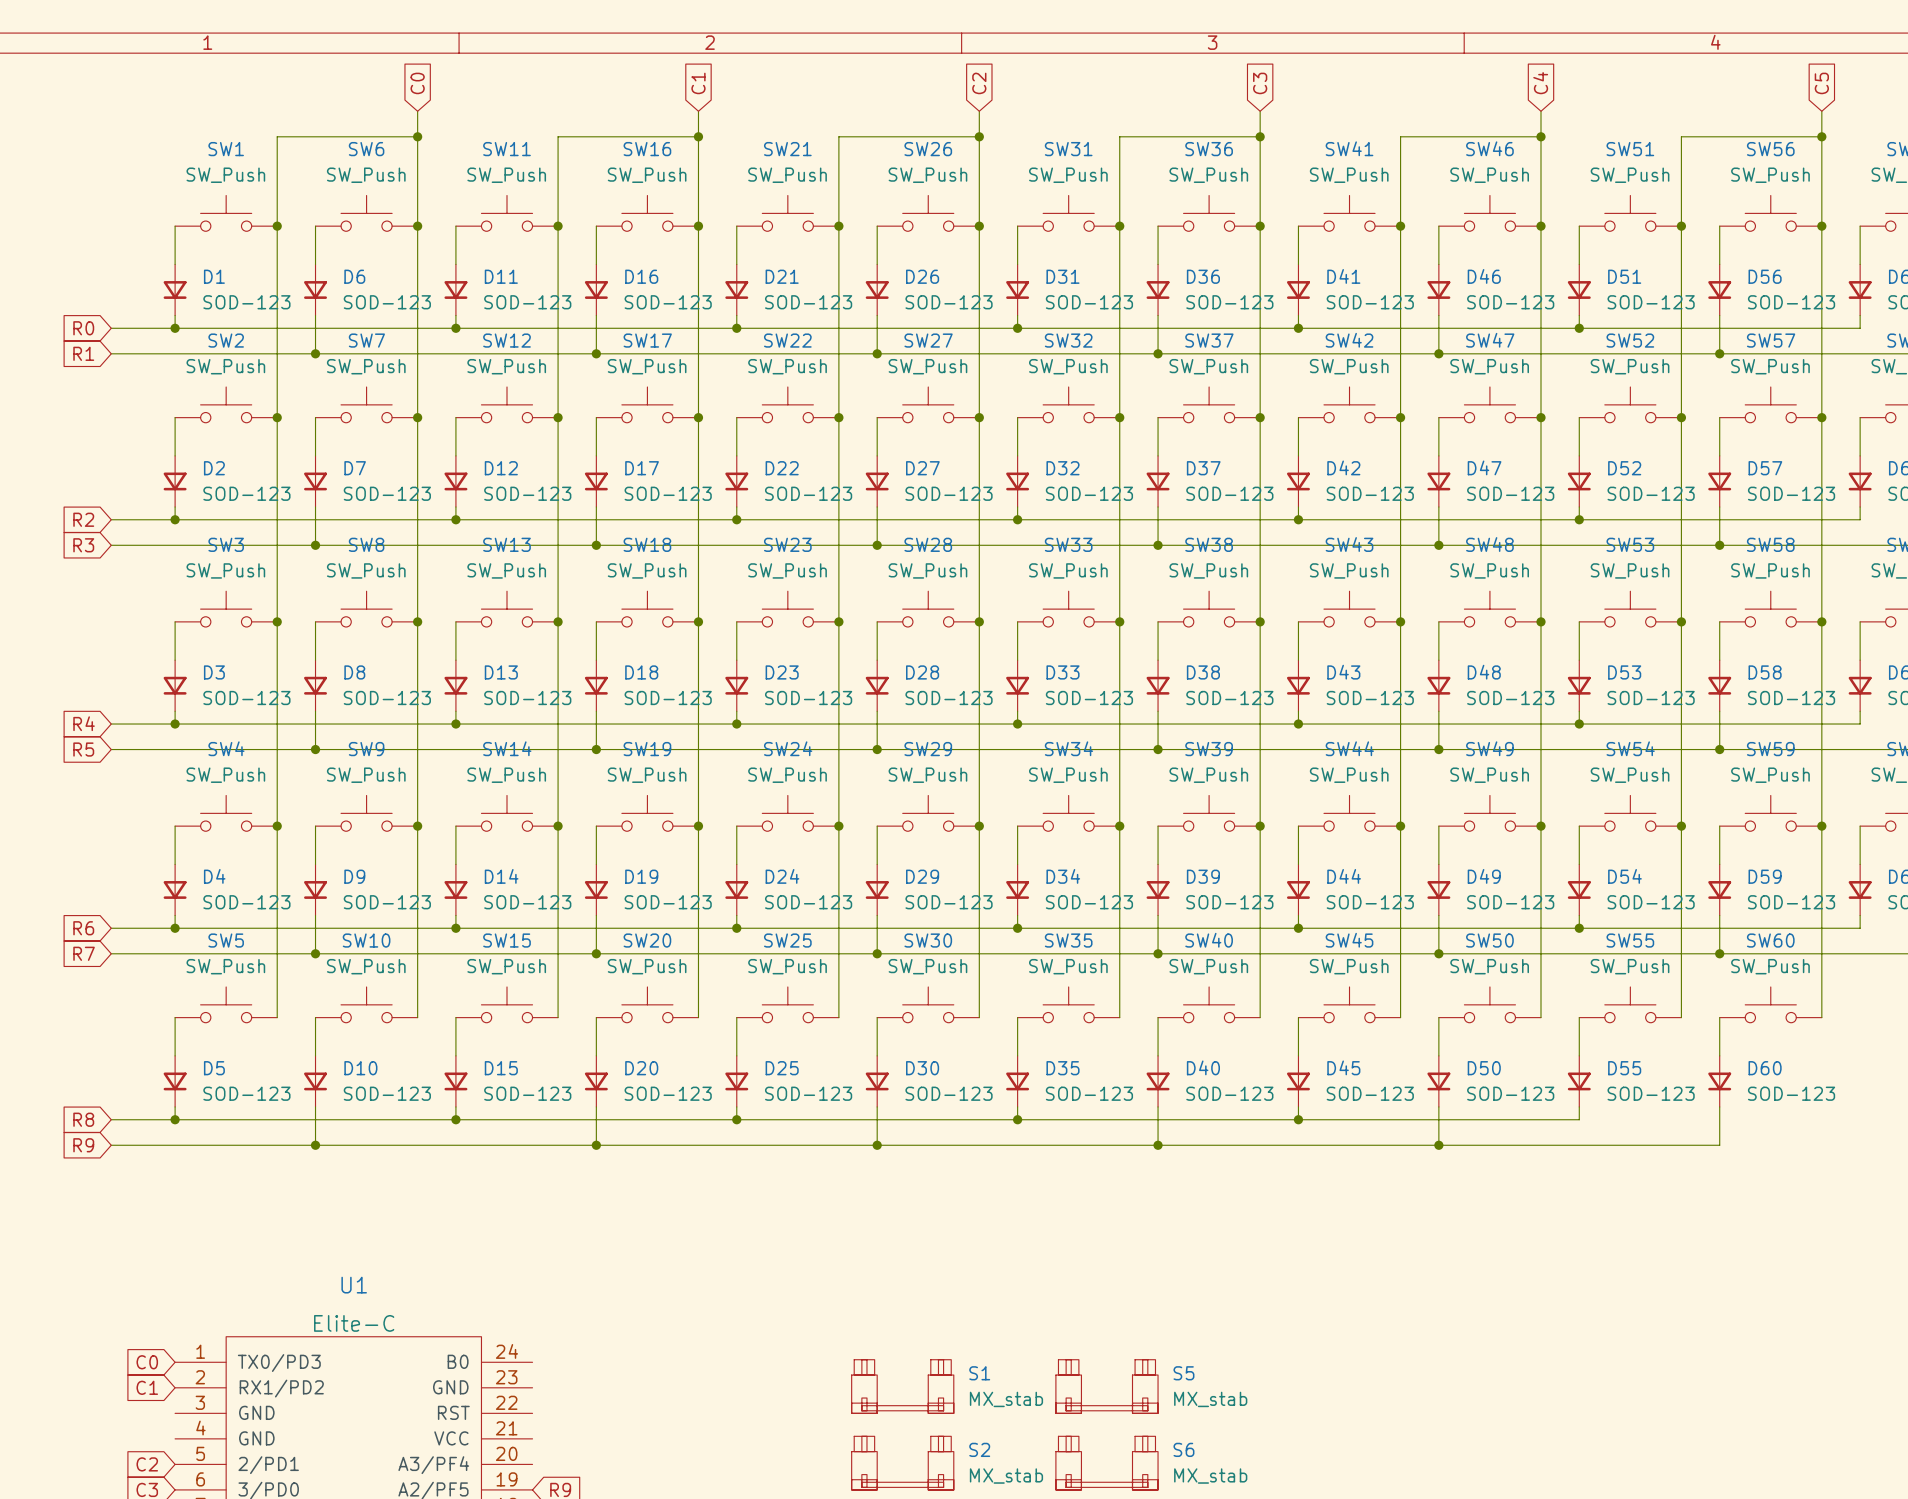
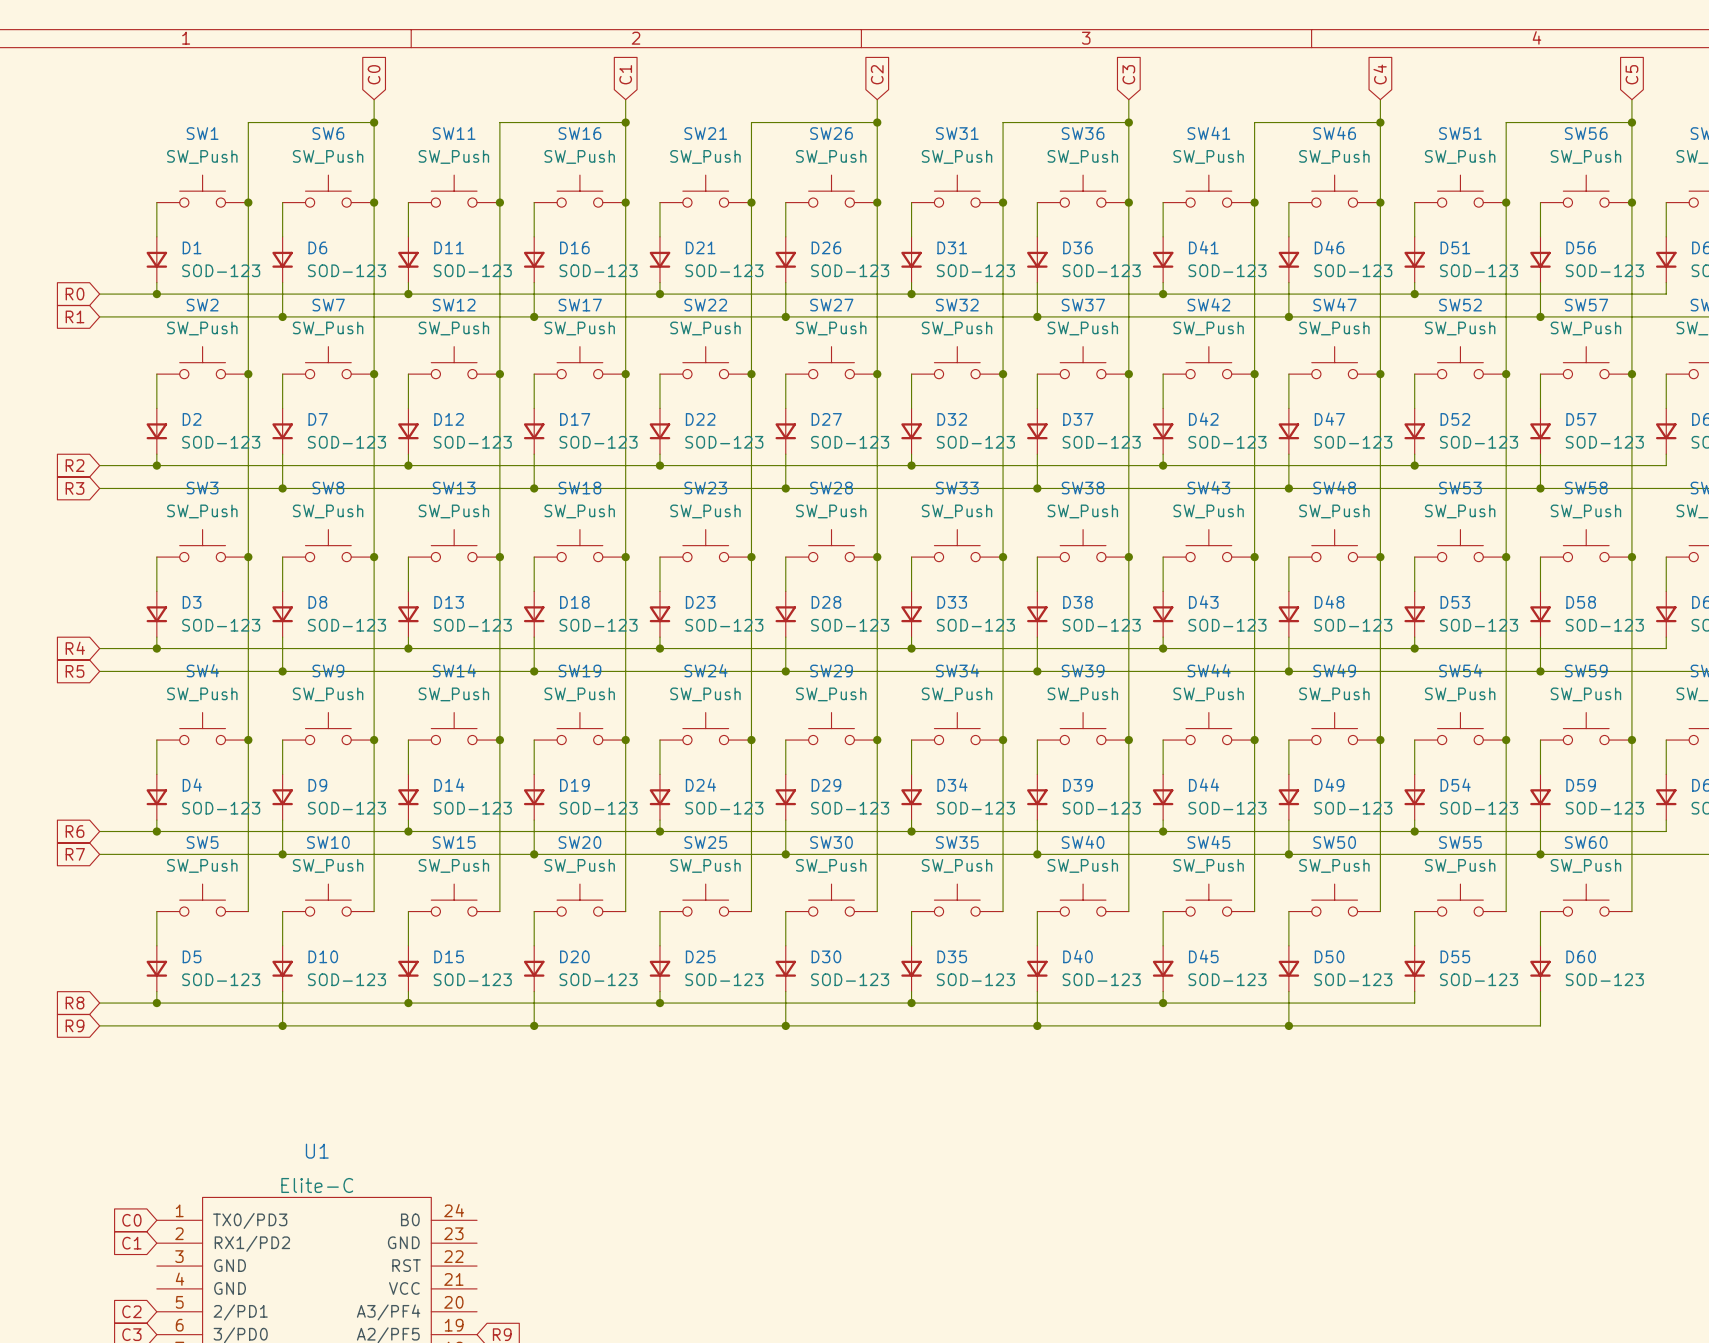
S1: MX_stab (902, 1386) -> none
S5: MX_stab (1106, 1386) -> none
S2: MX_stab (902, 1463) -> none
S6: MX_stab (1106, 1463) -> none

